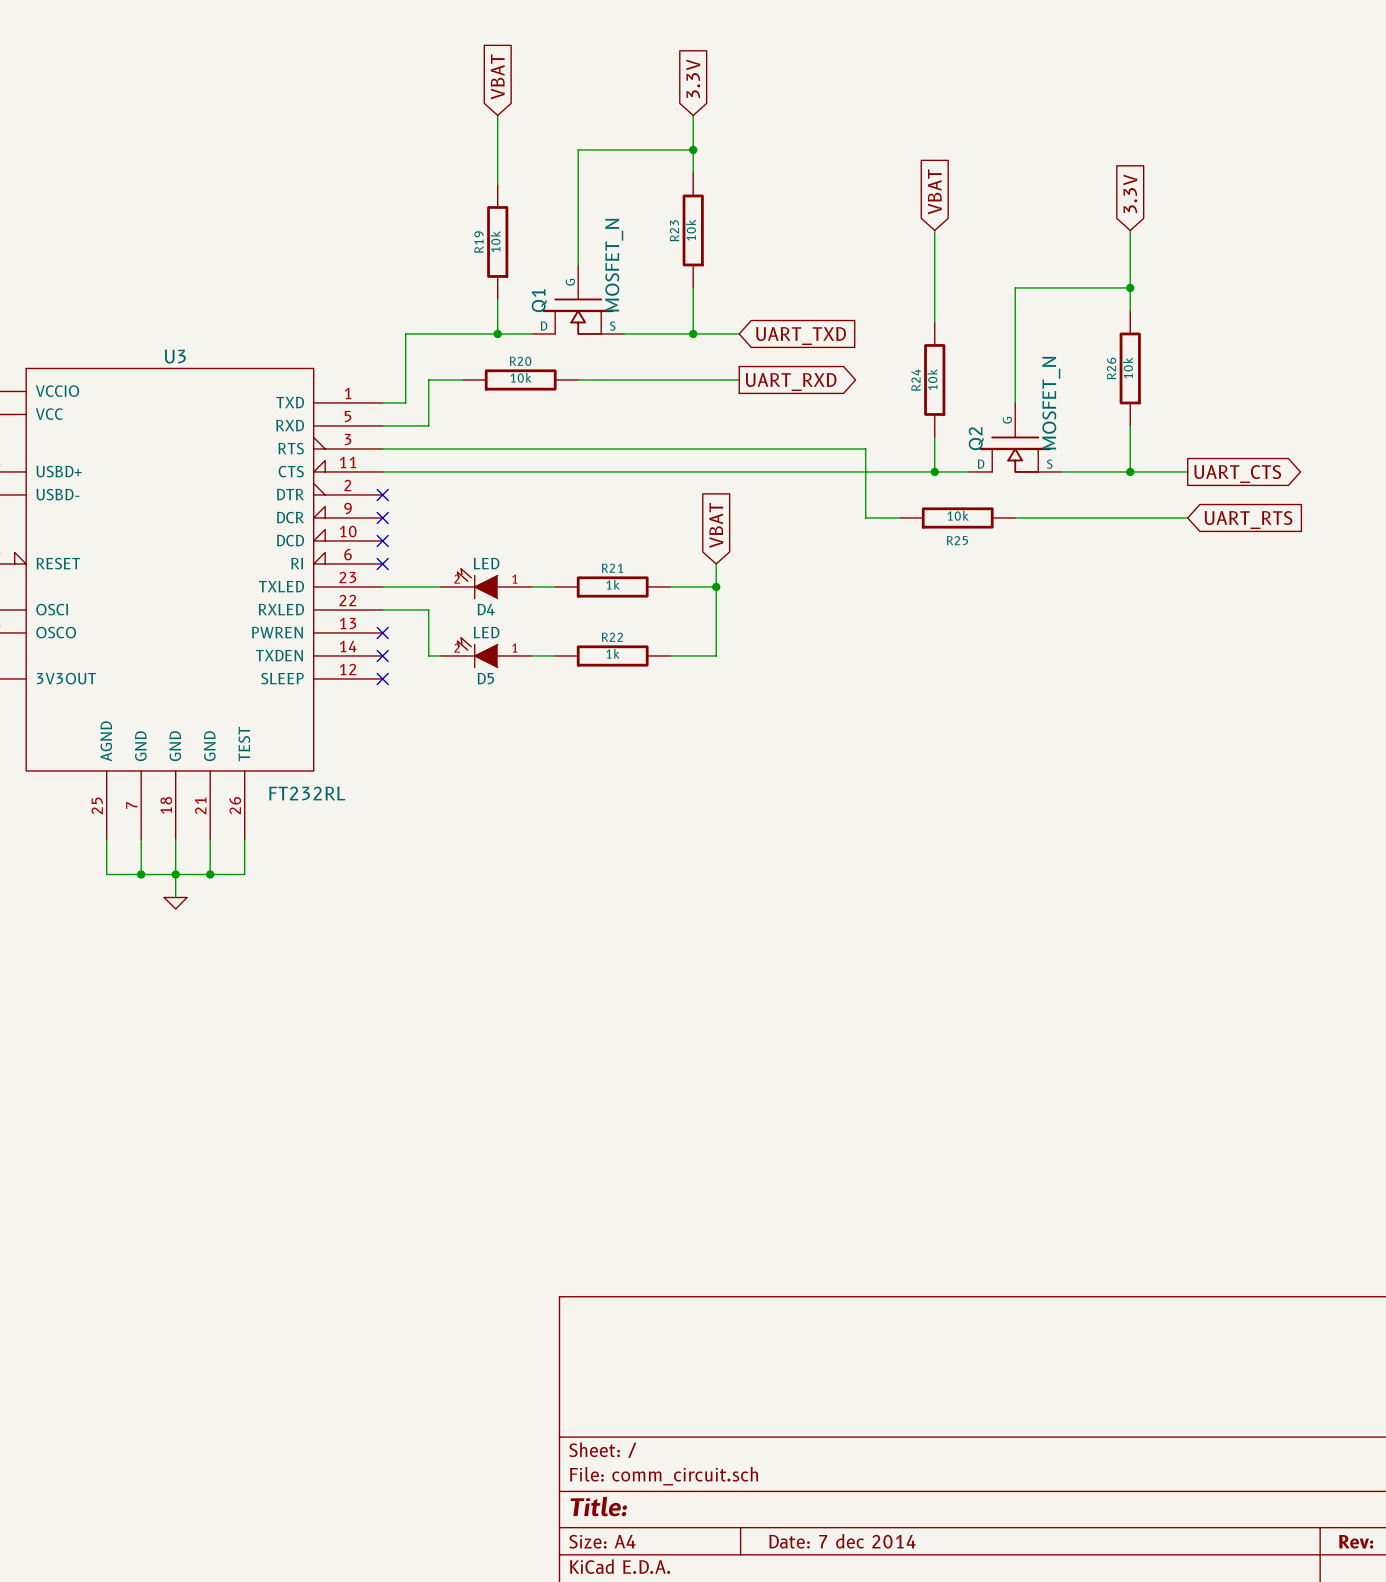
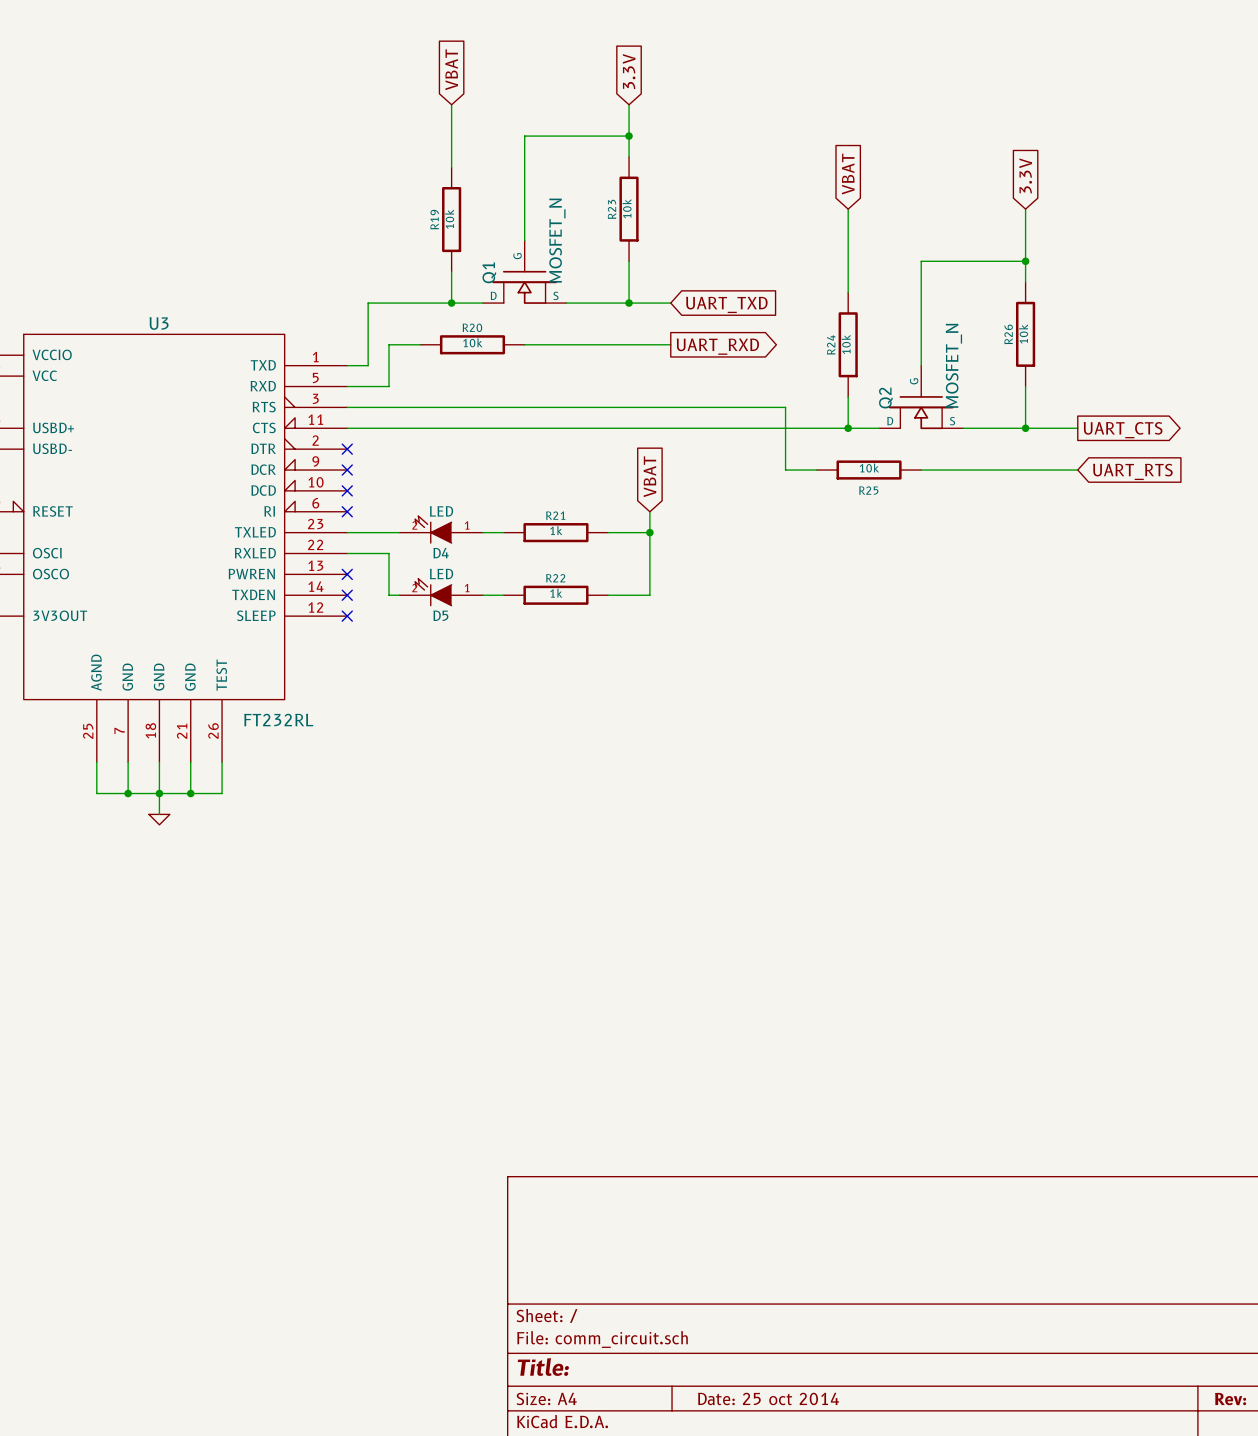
title block: Date: 7 dec 2014 (842, 1541) -> Date: 25 oct 2014 (768, 1398)

